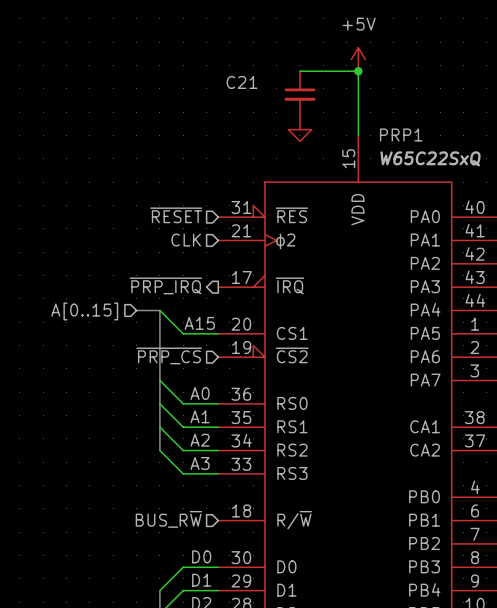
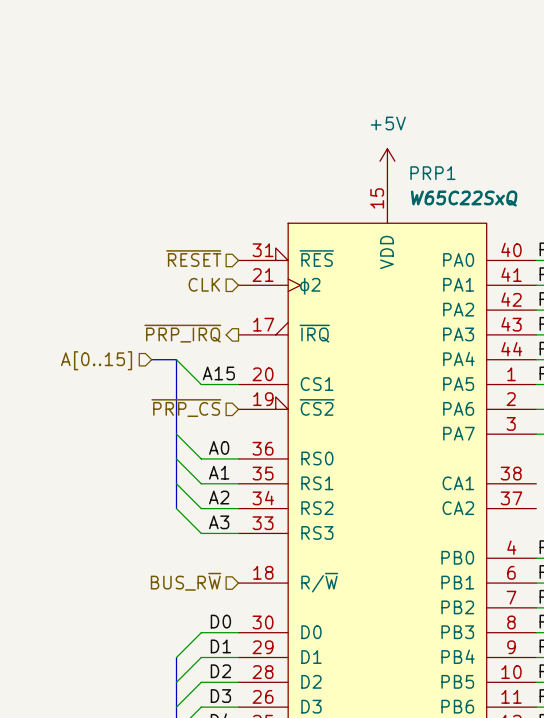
power symbol position: +5V (358, 59) -> +5V (387, 161)
wire: (299, 71) (358, 71) (358, 135) -> none
junction: (358, 71) -> none
C21: (299, 94) -> none
power symbol: (299, 129) -> none

